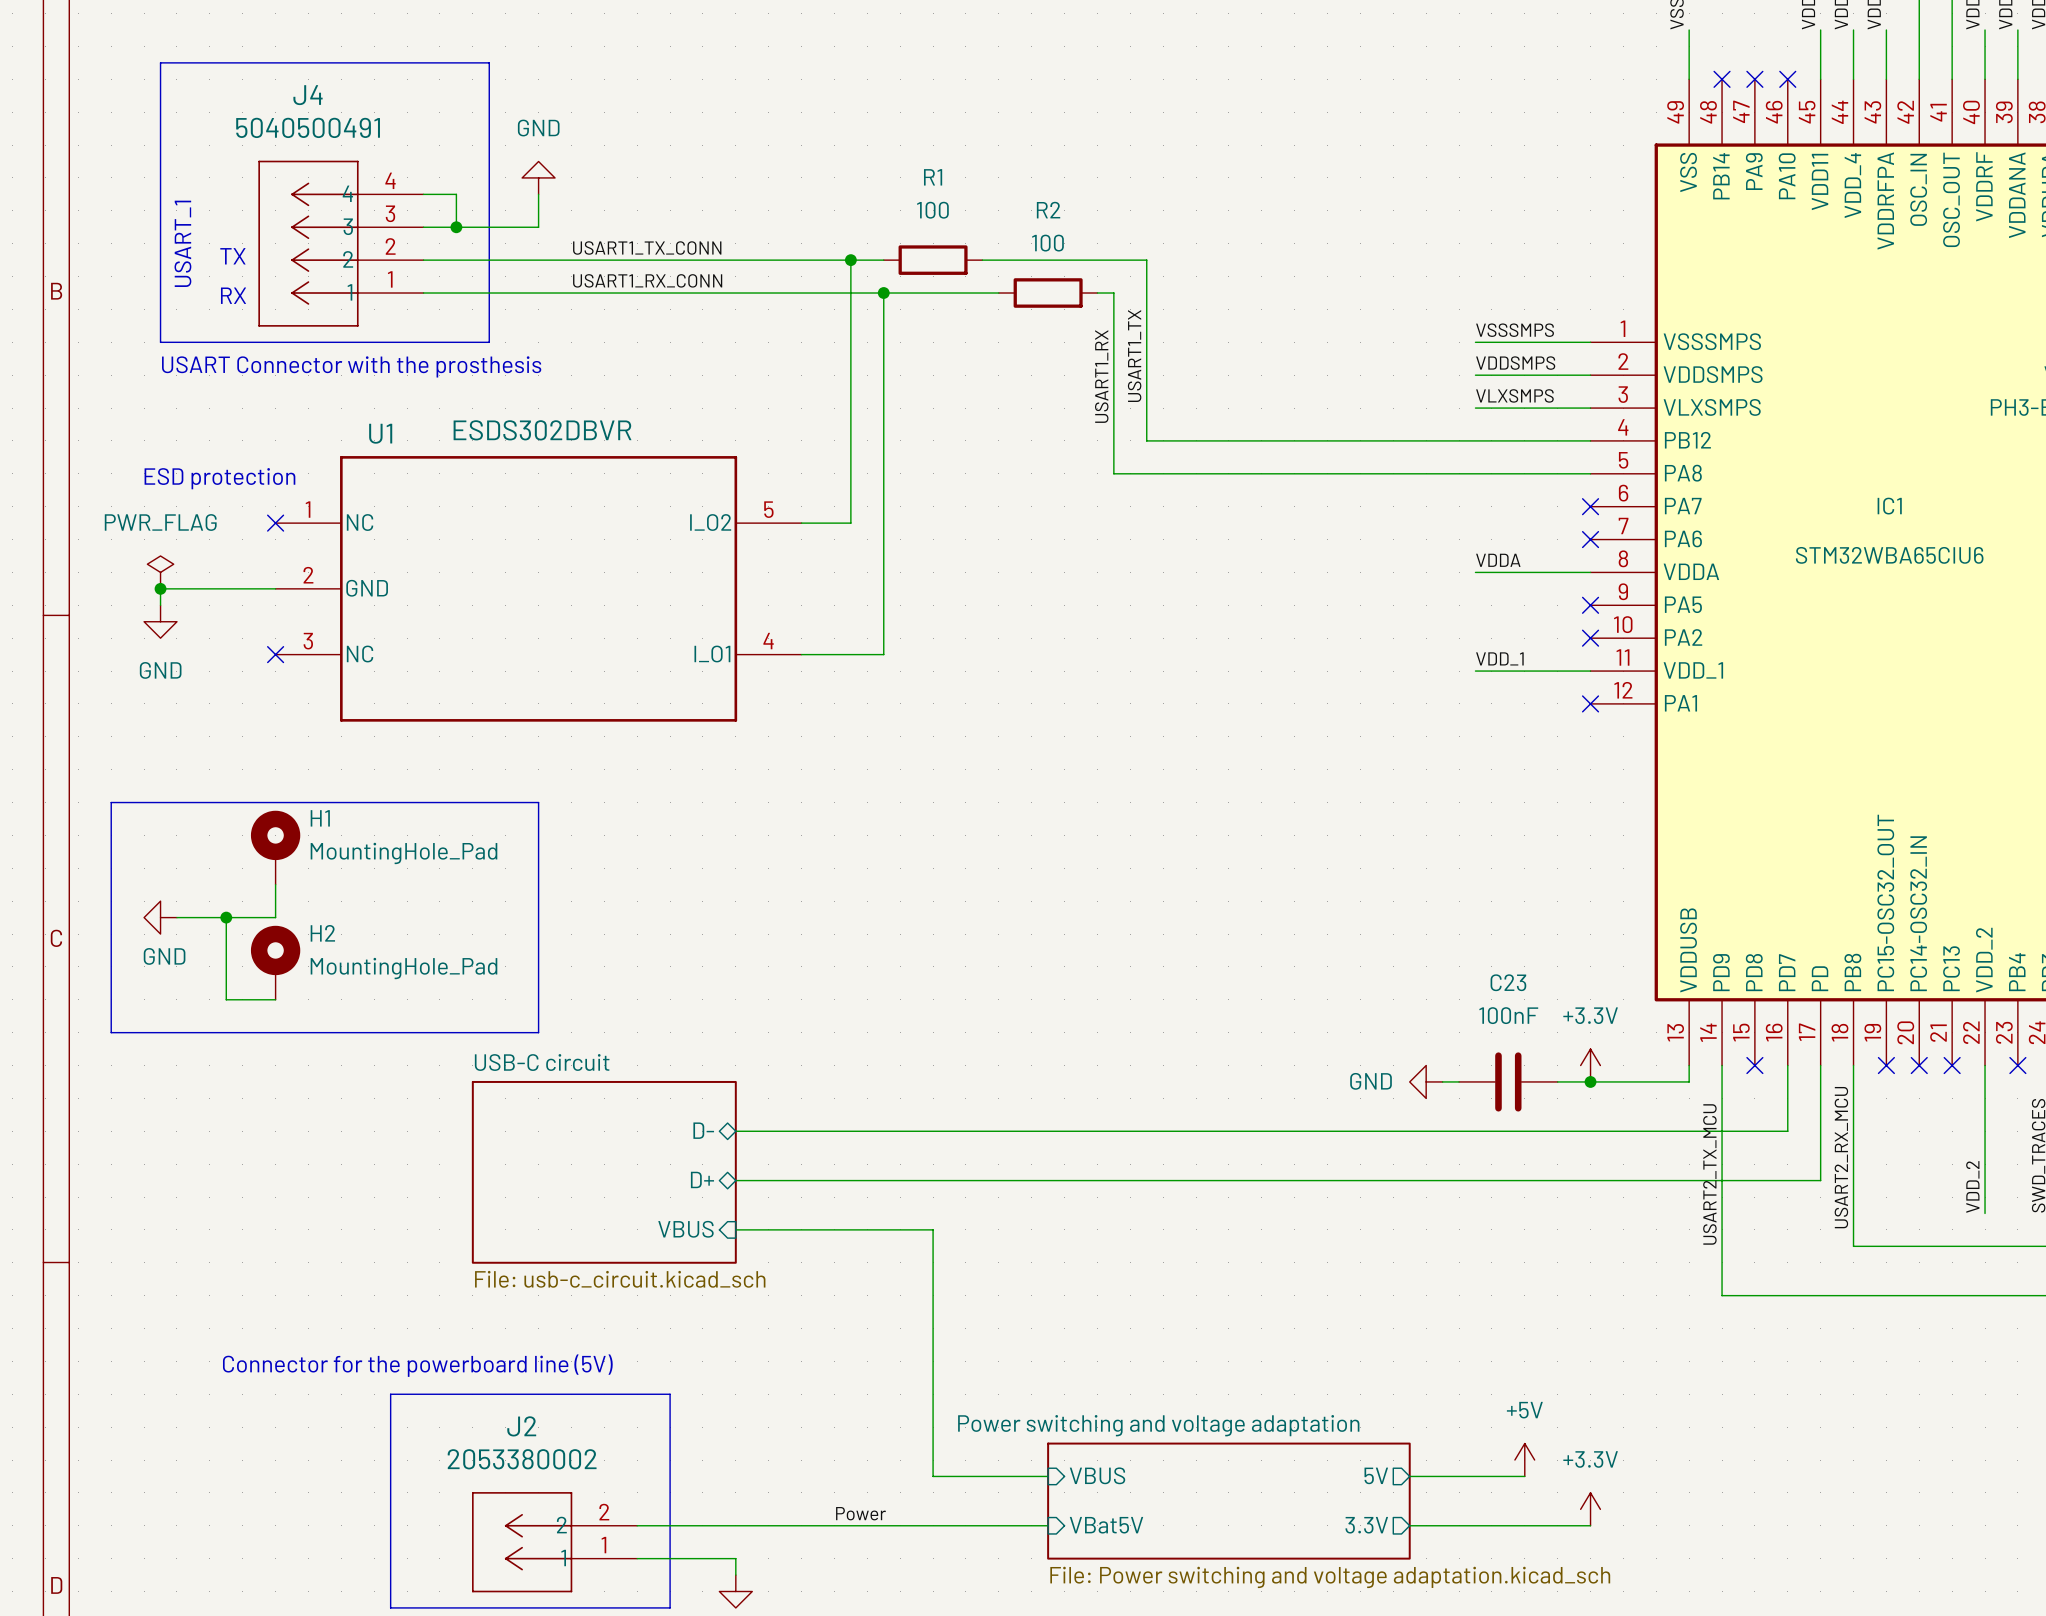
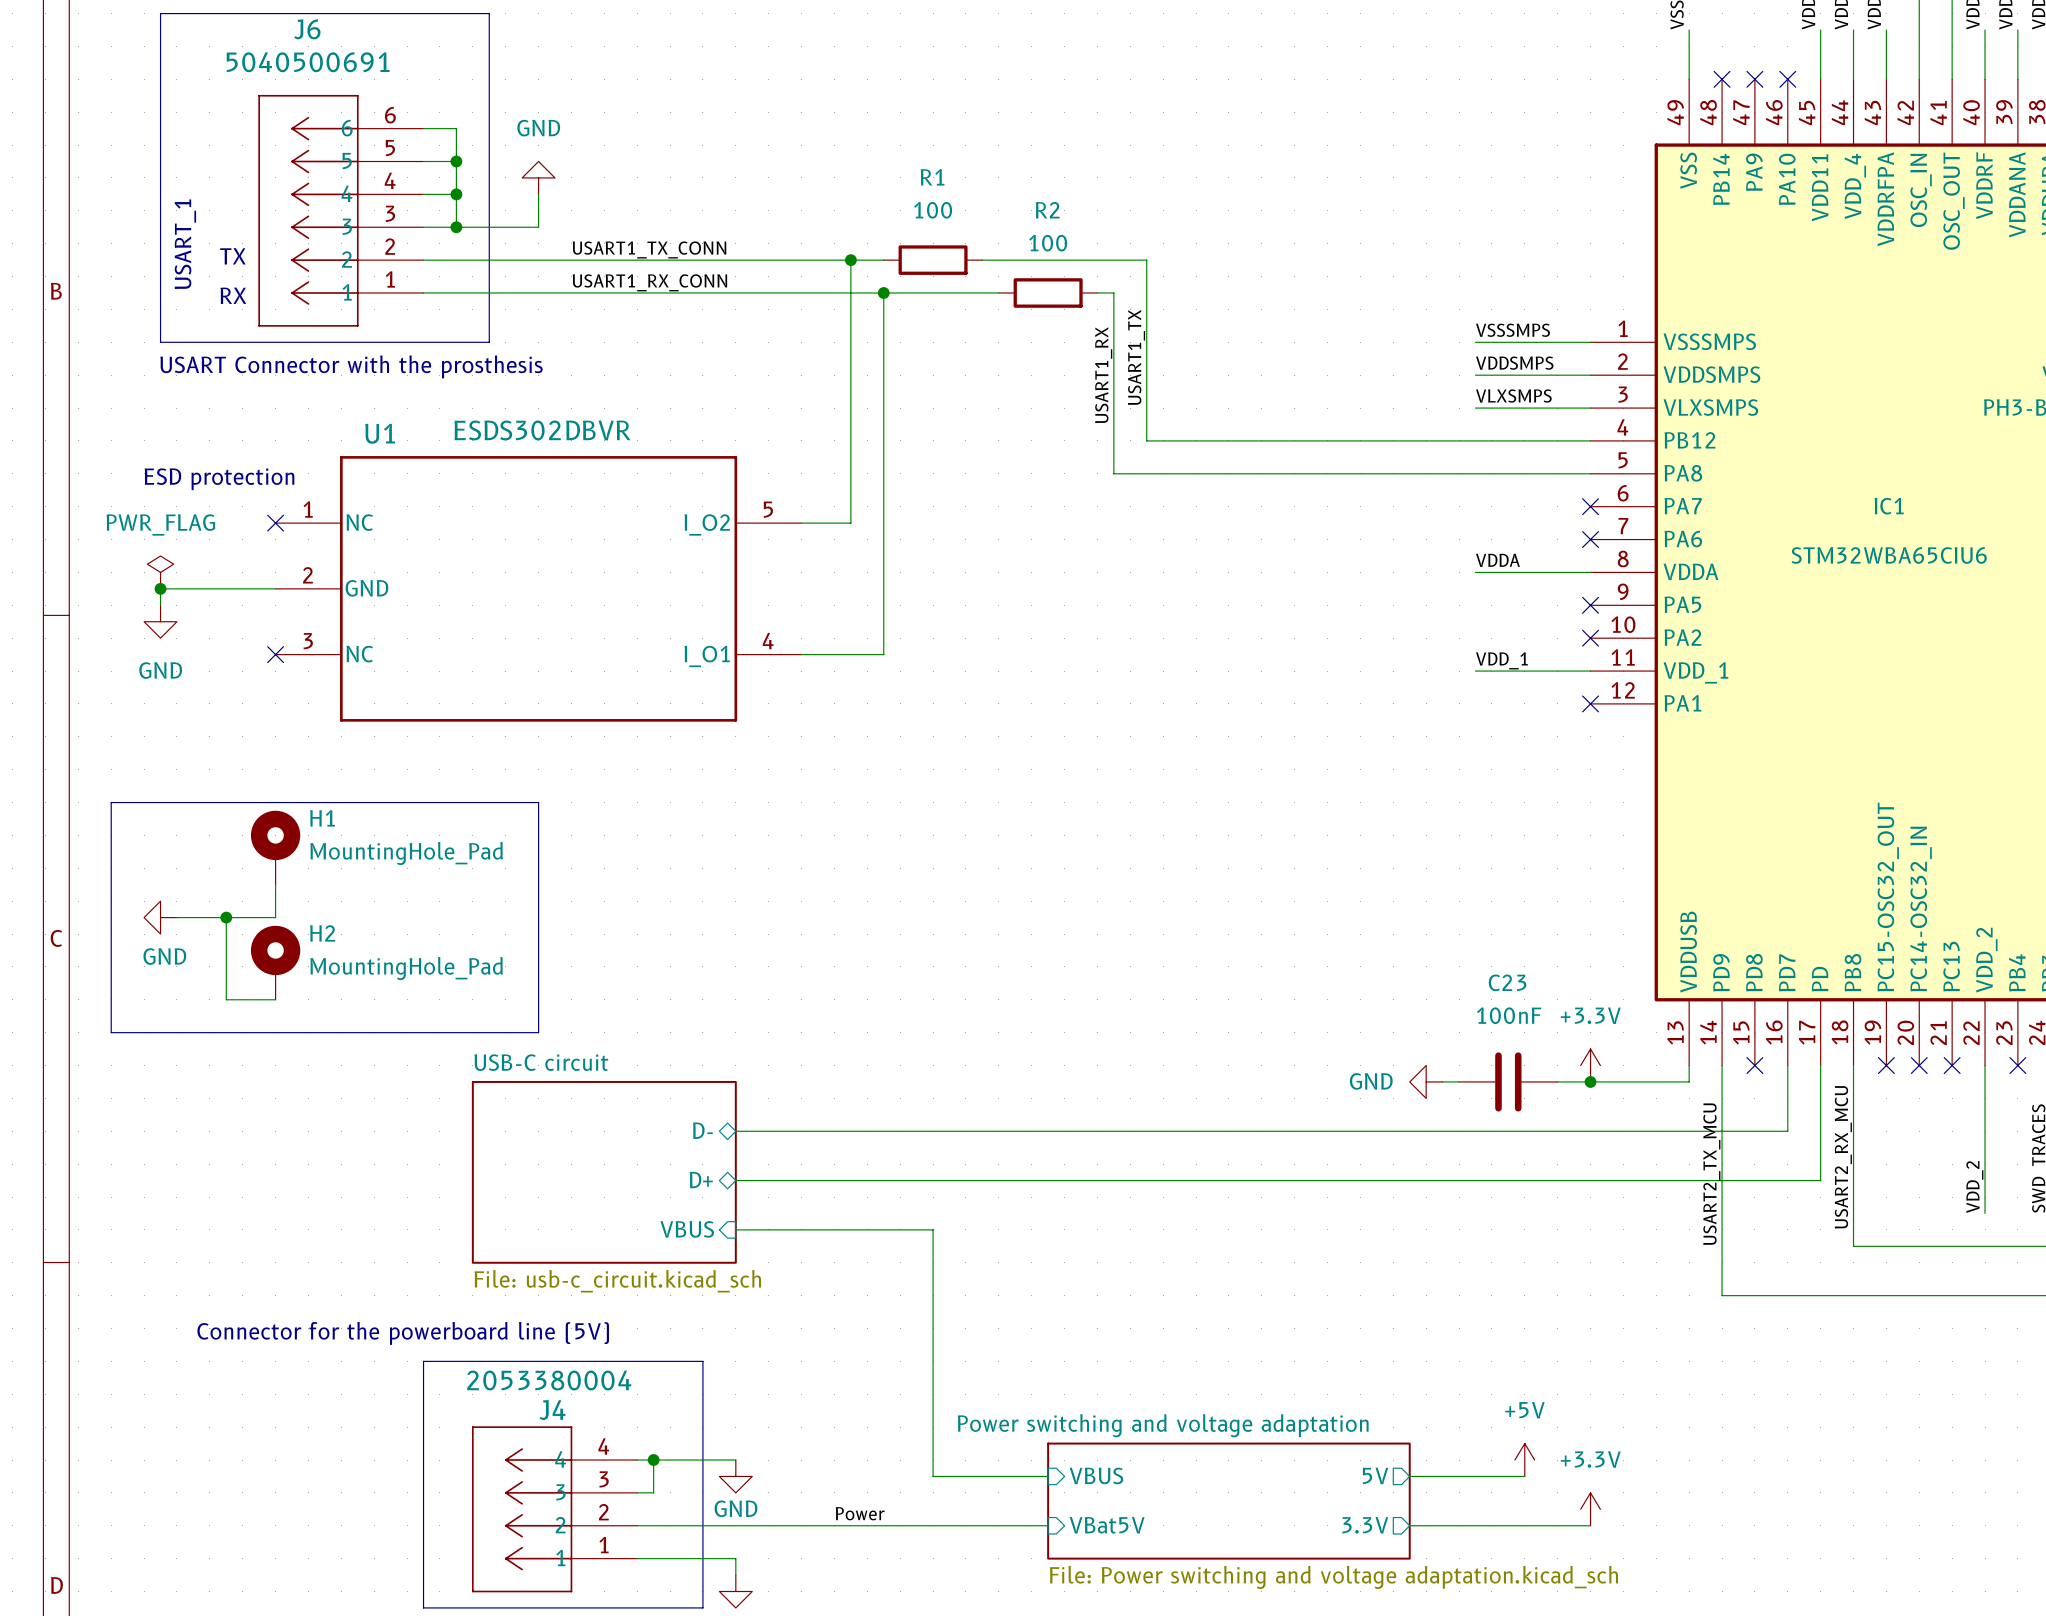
line: (160, 62) (489, 62) -> (160, 62) (160, 13) (489, 13) (489, 62)
J4 name position: J4 (308, 95) -> J4 (552, 1410)
J4 value: 5040500491 (308, 127) -> 2053380004 (549, 1380)
wire: none -> (423, 128) (456, 128) (456, 194)
wire: none -> (423, 161) (456, 161)
junction: none -> (456, 161)
junction: none -> (456, 194)
J6: none -> 5040500691 (340, 210)
J4 position: (340, 243) -> (554, 1509)
text position: Connector for the powerboard line (5V) (417, 1365) -> Connector for the powerboard line (5V) (403, 1333)
wire: none -> (637, 1460) (735, 1460)
wire: none -> (653, 1460) (653, 1492) (637, 1492)
junction: none -> (653, 1460)
power symbol: none -> GND (735, 1476)
J2: 2053380002 (554, 1542) -> none
line: (423, 1607) (390, 1607) (390, 1394) (670, 1394) (670, 1607) -> (423, 1607) (423, 1361) (702, 1361) (702, 1607) (670, 1607)

